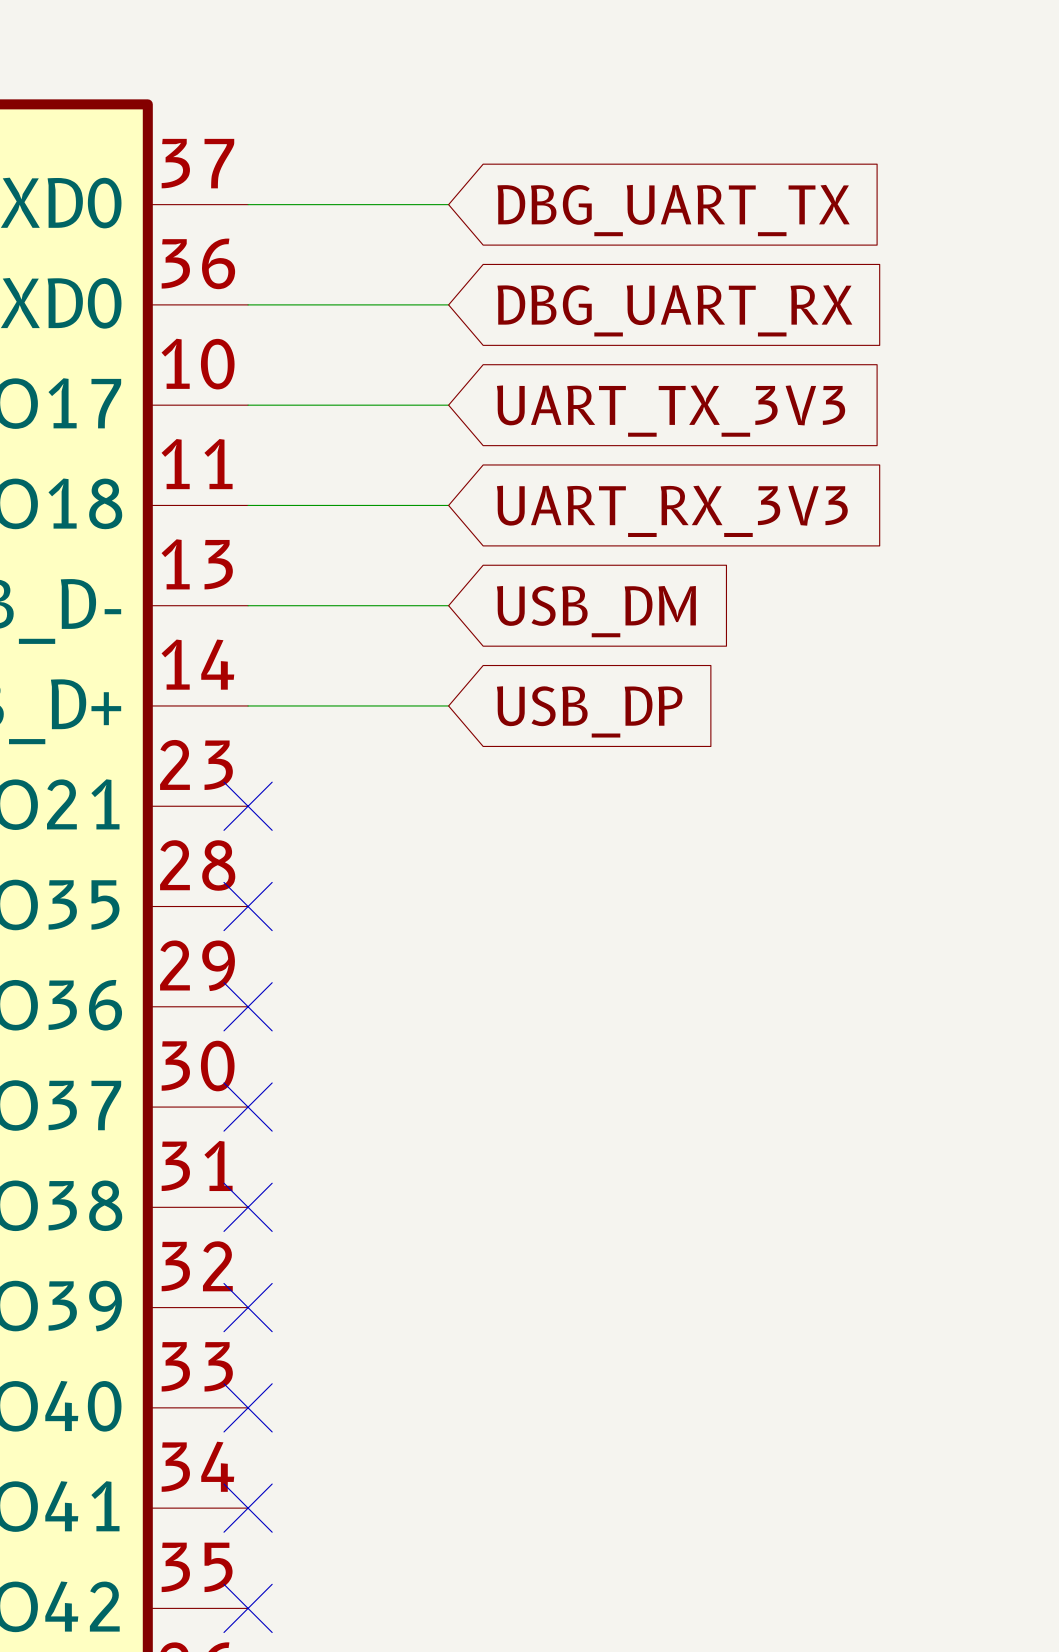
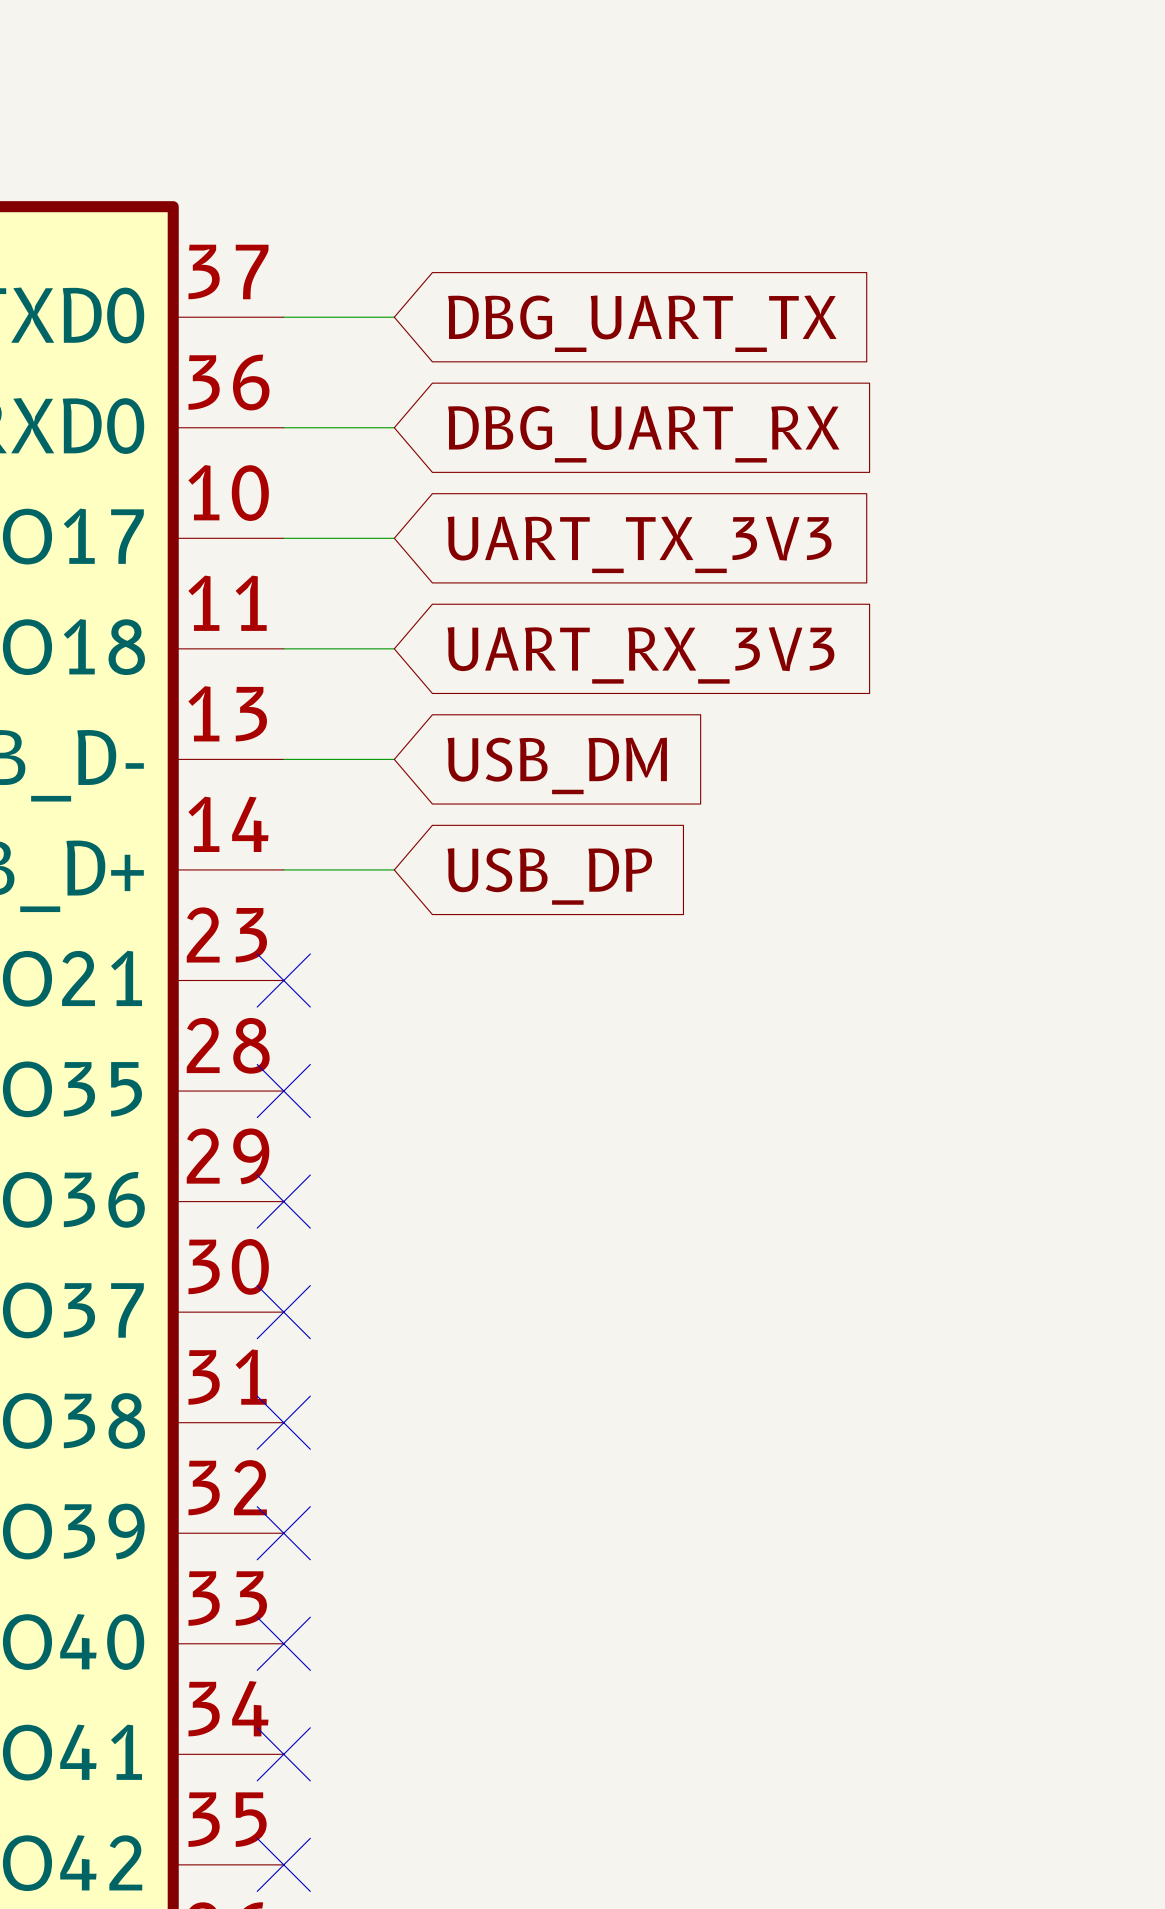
wire: (348, 204) (448, 204) -> none
global label position: DBG_UART_TX (673, 210) -> DBG_UART_TX (642, 323)
wire: (348, 304) (448, 304) -> none
global label position: DBG_UART_RX (674, 310) -> DBG_UART_RX (643, 434)
wire: (348, 405) (448, 405) -> none
global label position: UART_TX_3V3 (671, 411) -> UART_TX_3V3 (639, 544)
wire: (348, 505) (448, 505) -> none
global label position: UART_RX_3V3 (672, 511) -> UART_RX_3V3 (640, 655)
wire: (348, 605) (448, 605) -> none
global label position: USB_DM (596, 611) -> USB_DM (557, 765)
wire: (348, 705) (448, 705) -> none
global label position: USB_DP (589, 711) -> USB_DP (549, 876)

